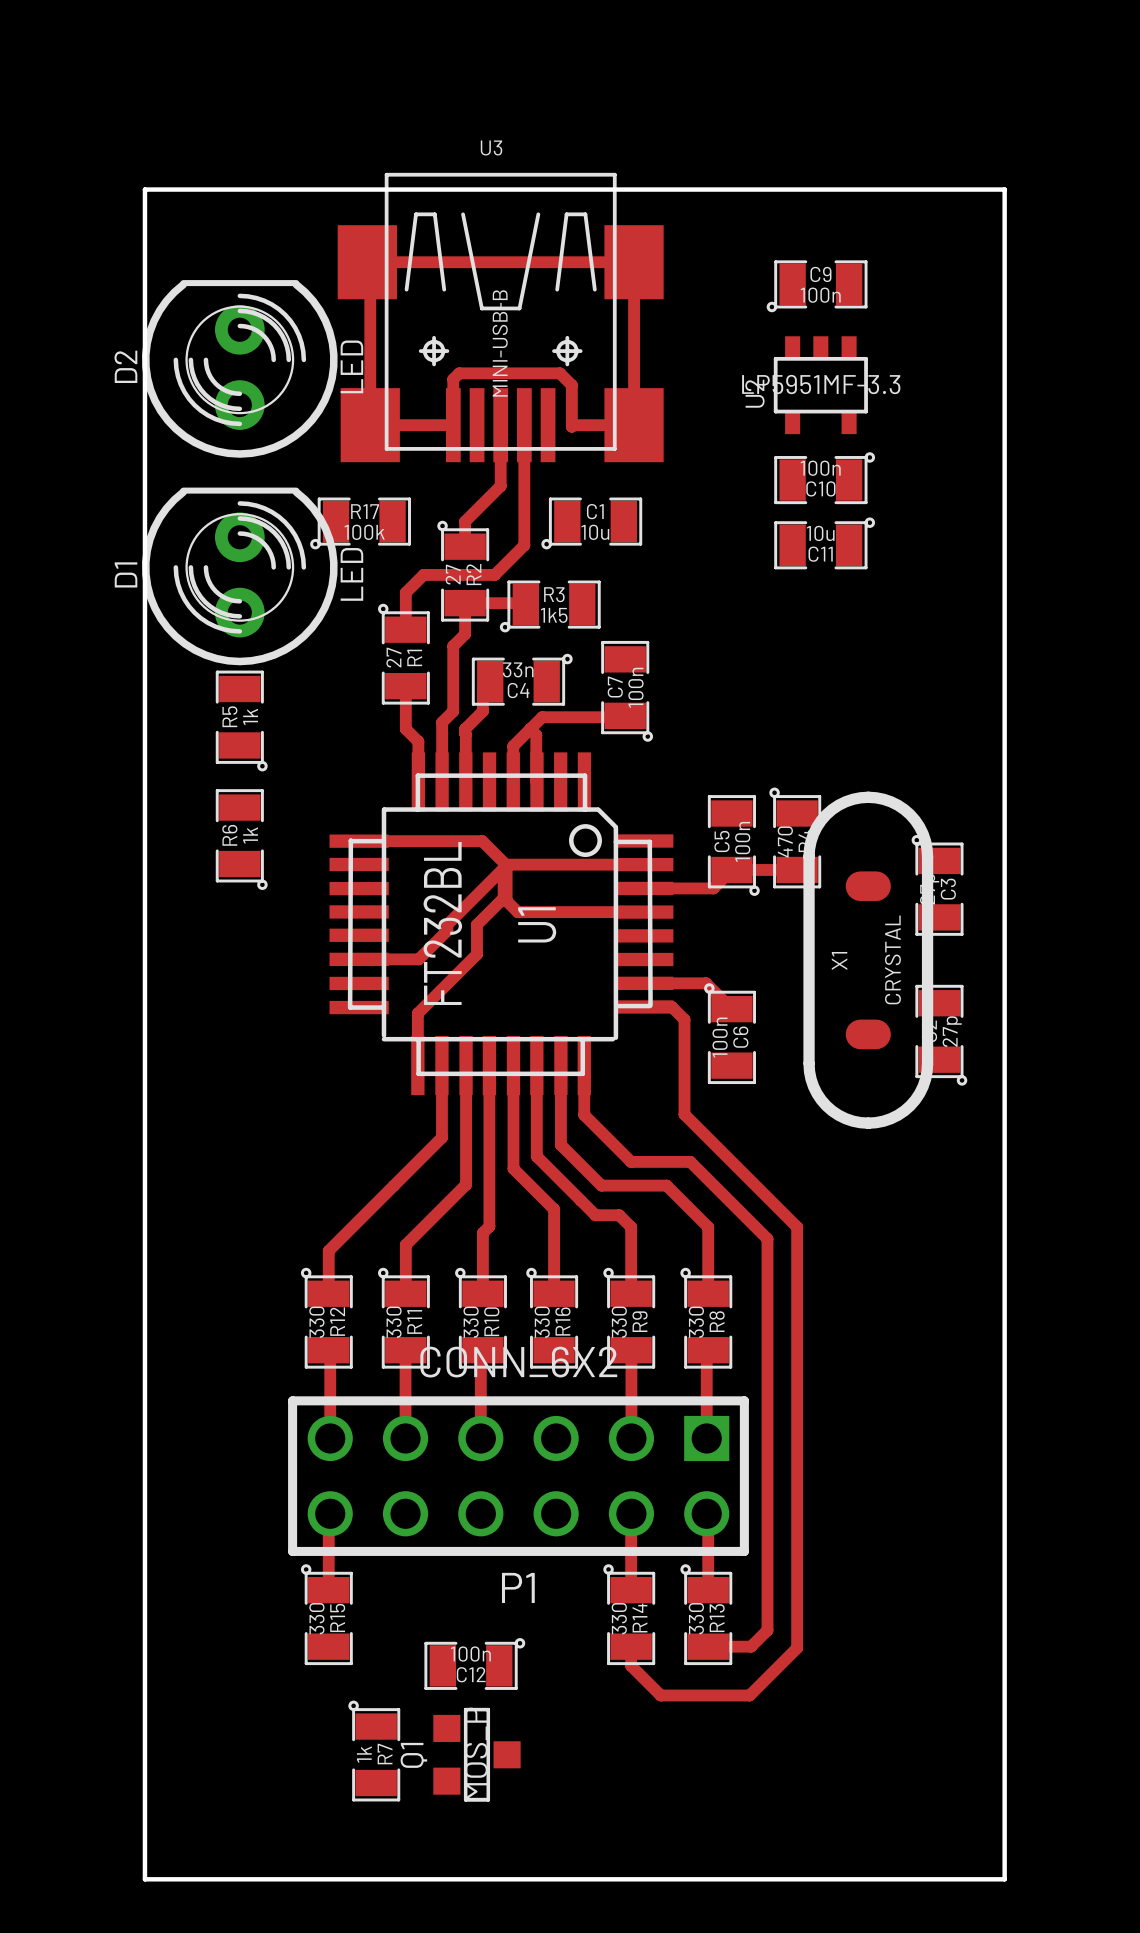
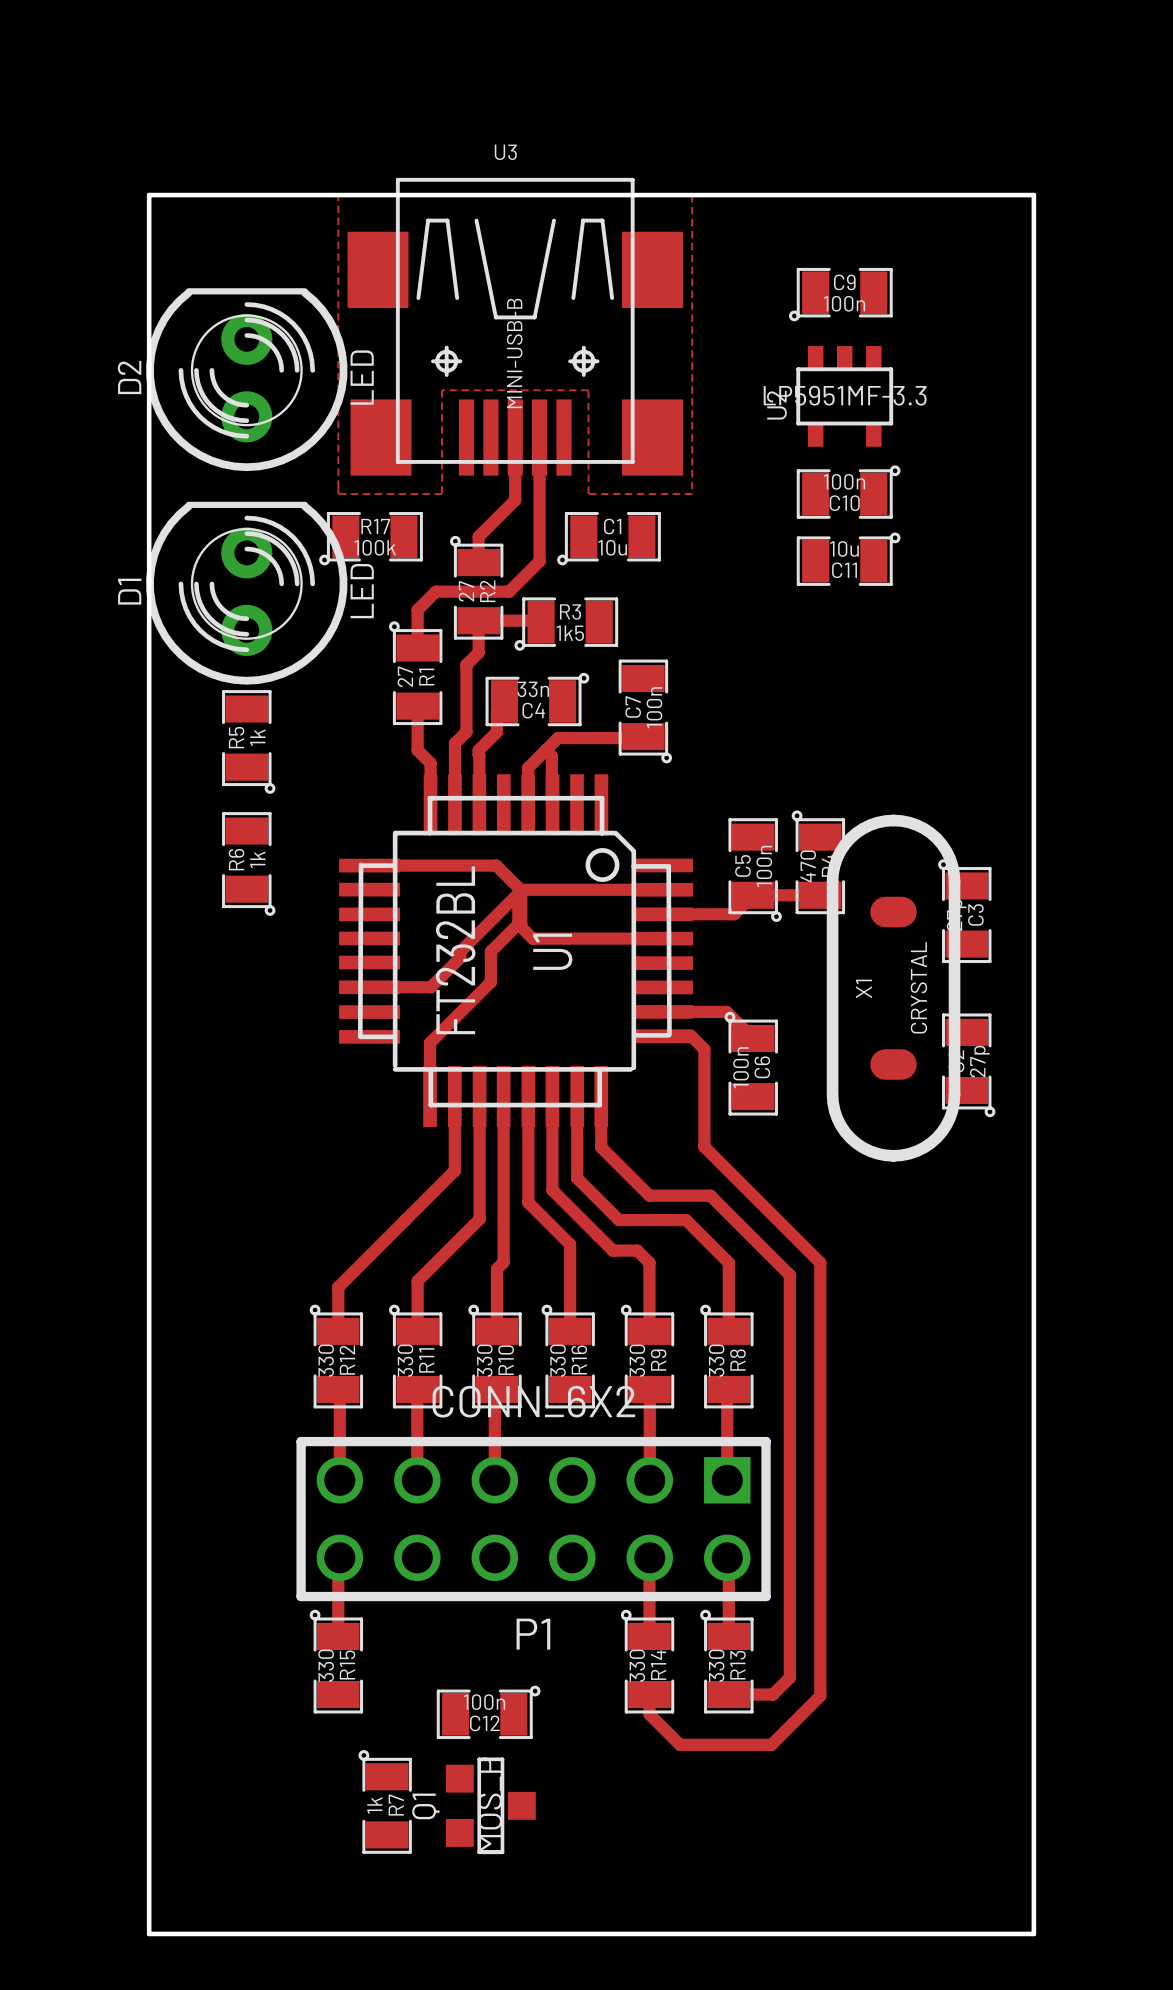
top zone outline: none -> (338, 195) (338, 494) (442, 494) (442, 390) (588, 390) (588, 494) (692, 494) (692, 195) (338, 195)
top track: (367, 262) (634, 262) (634, 425) (571, 426) (571, 385) (559, 373) (459, 373) (453, 379) (453, 425) (370, 425) (370, 265) (367, 262) -> none

